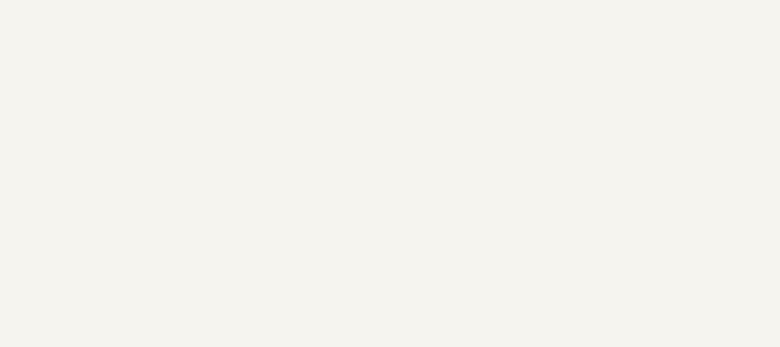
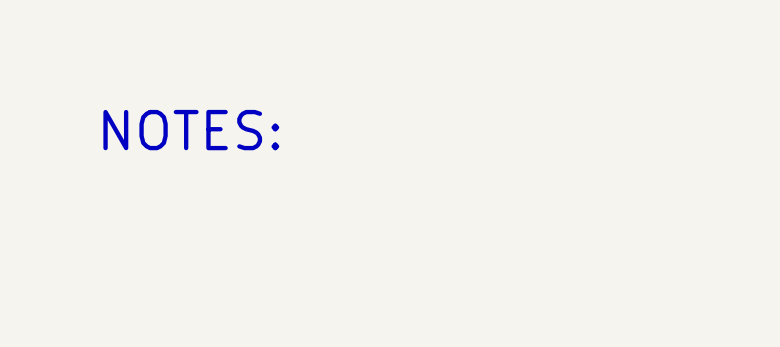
text: none -> NOTES: (191, 130)

